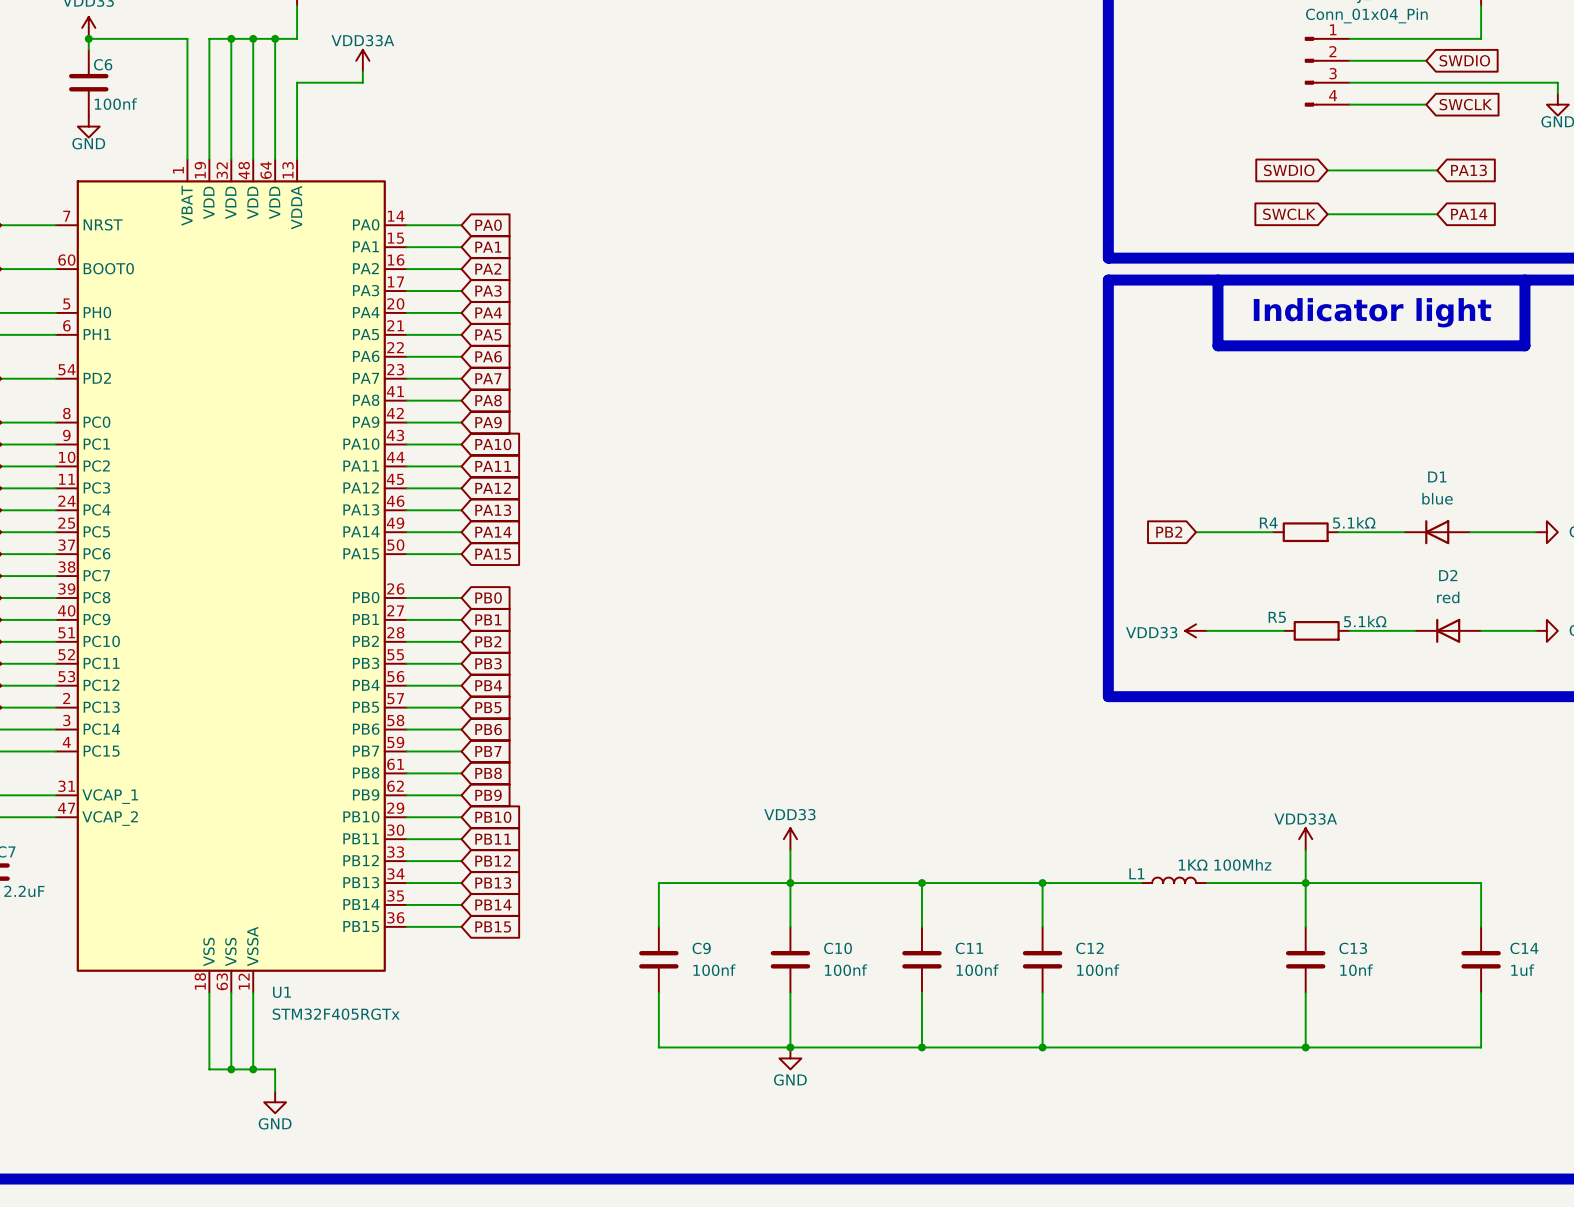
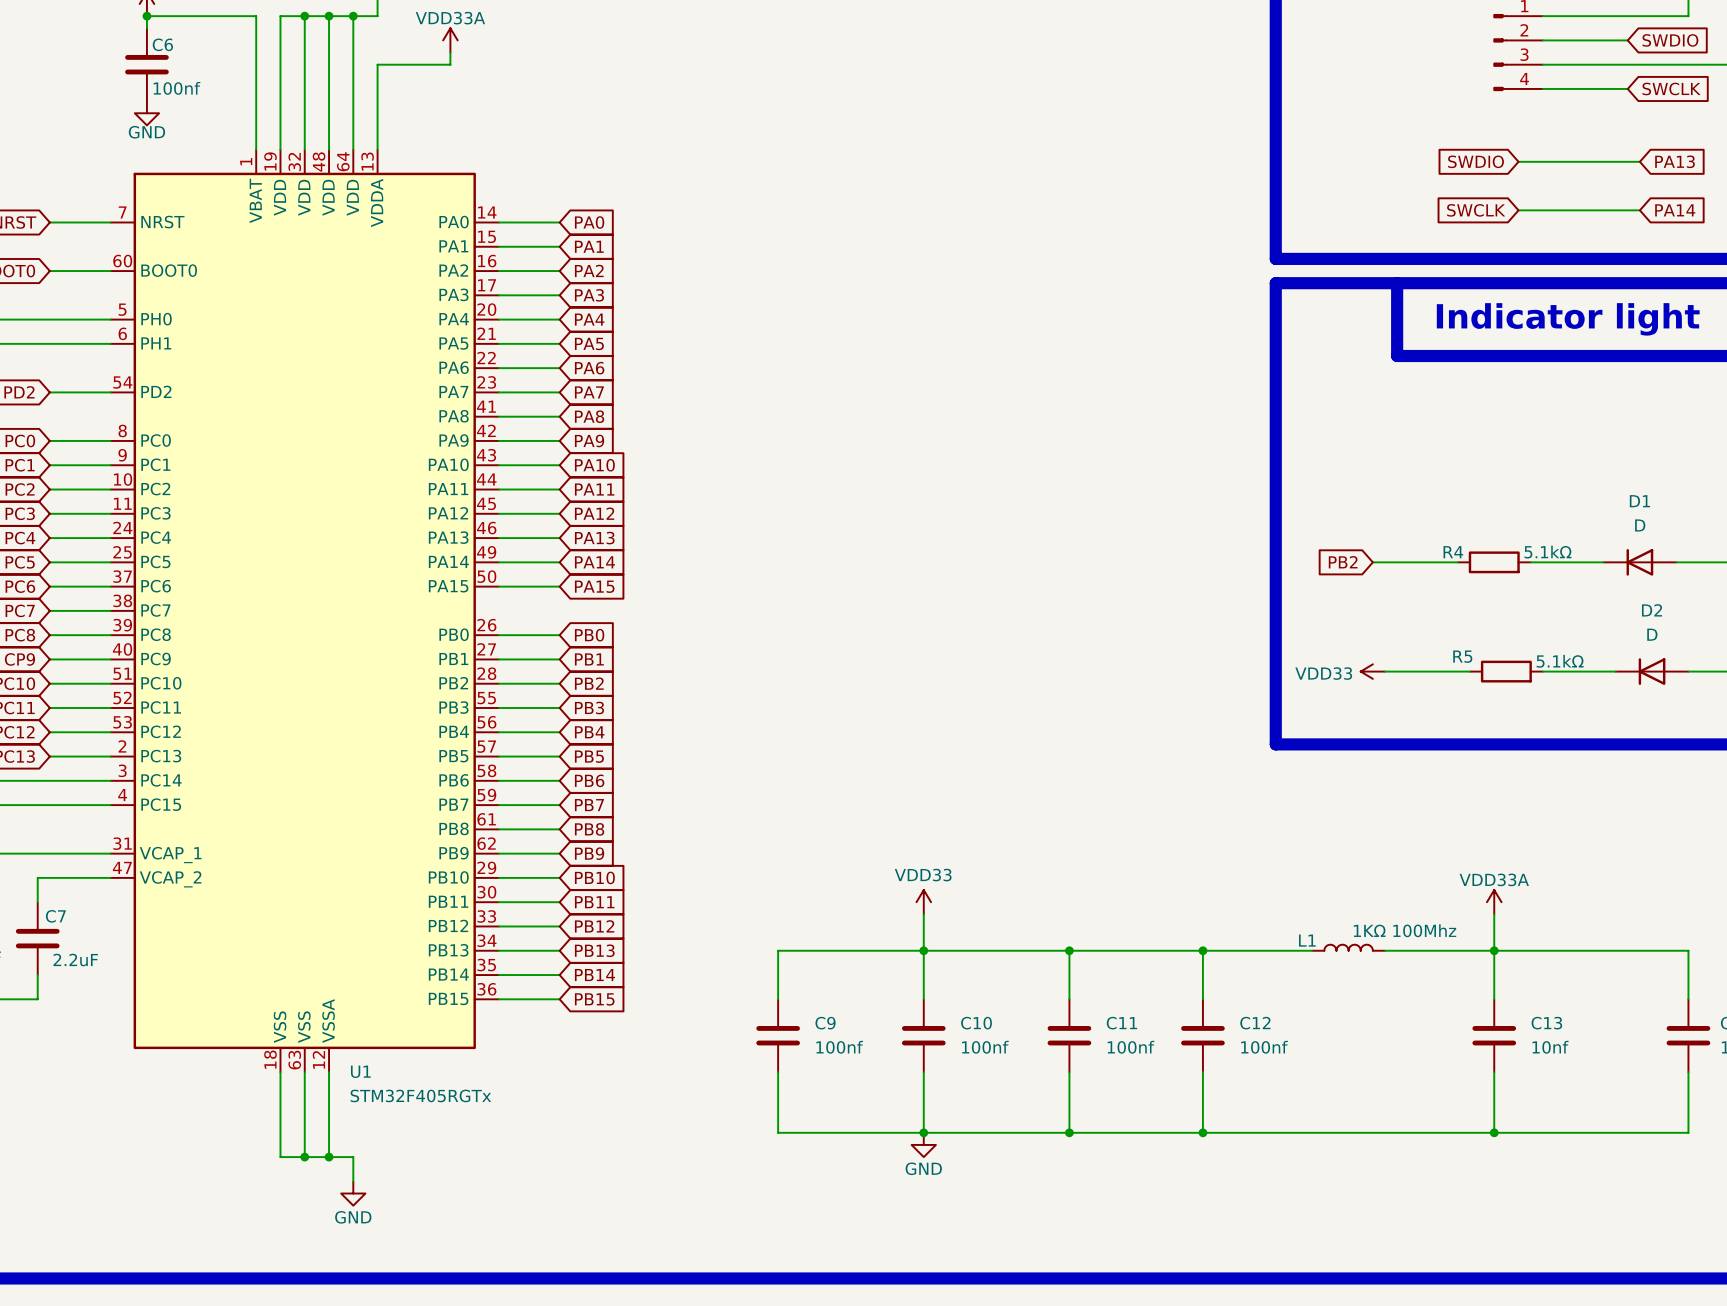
D1 value: blue (1437, 498) -> D (1640, 525)
D2 value: red (1448, 597) -> D (1652, 634)

